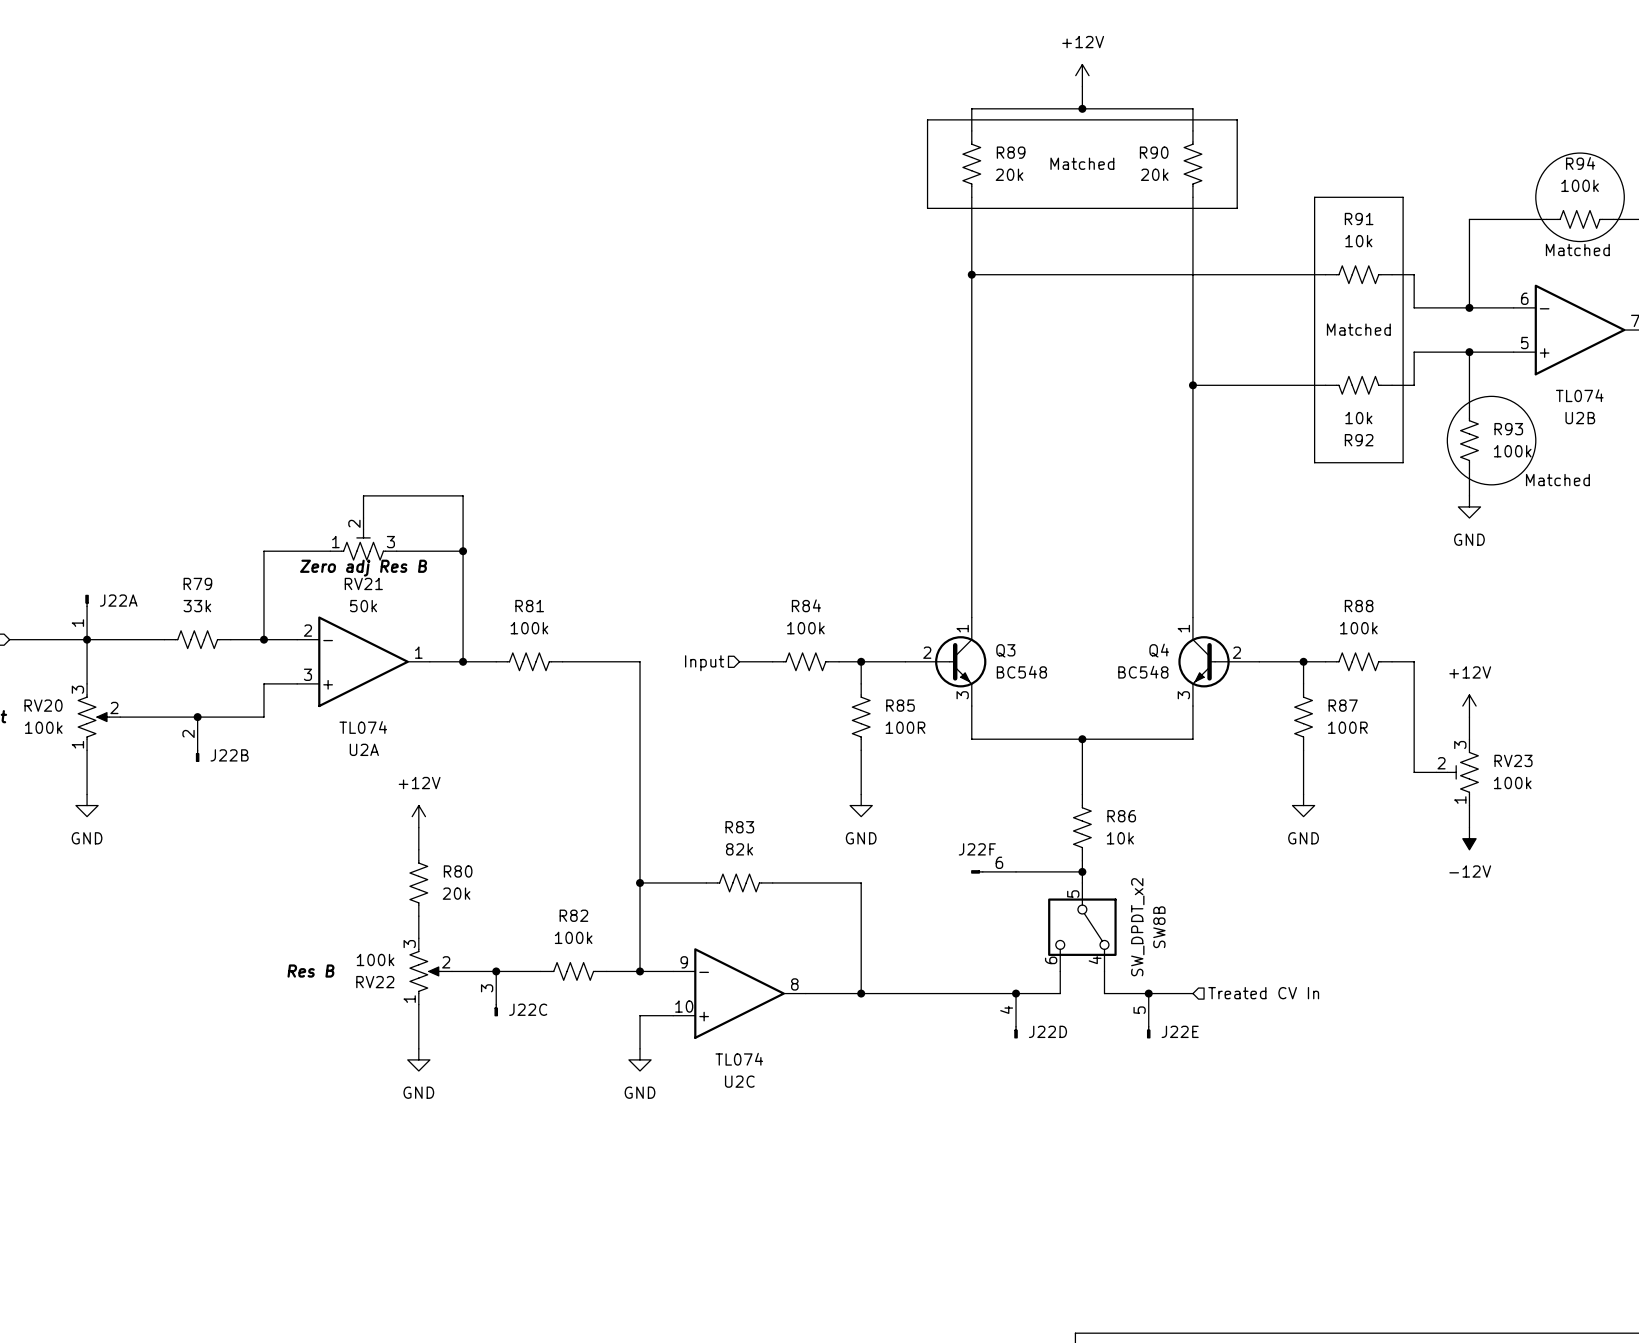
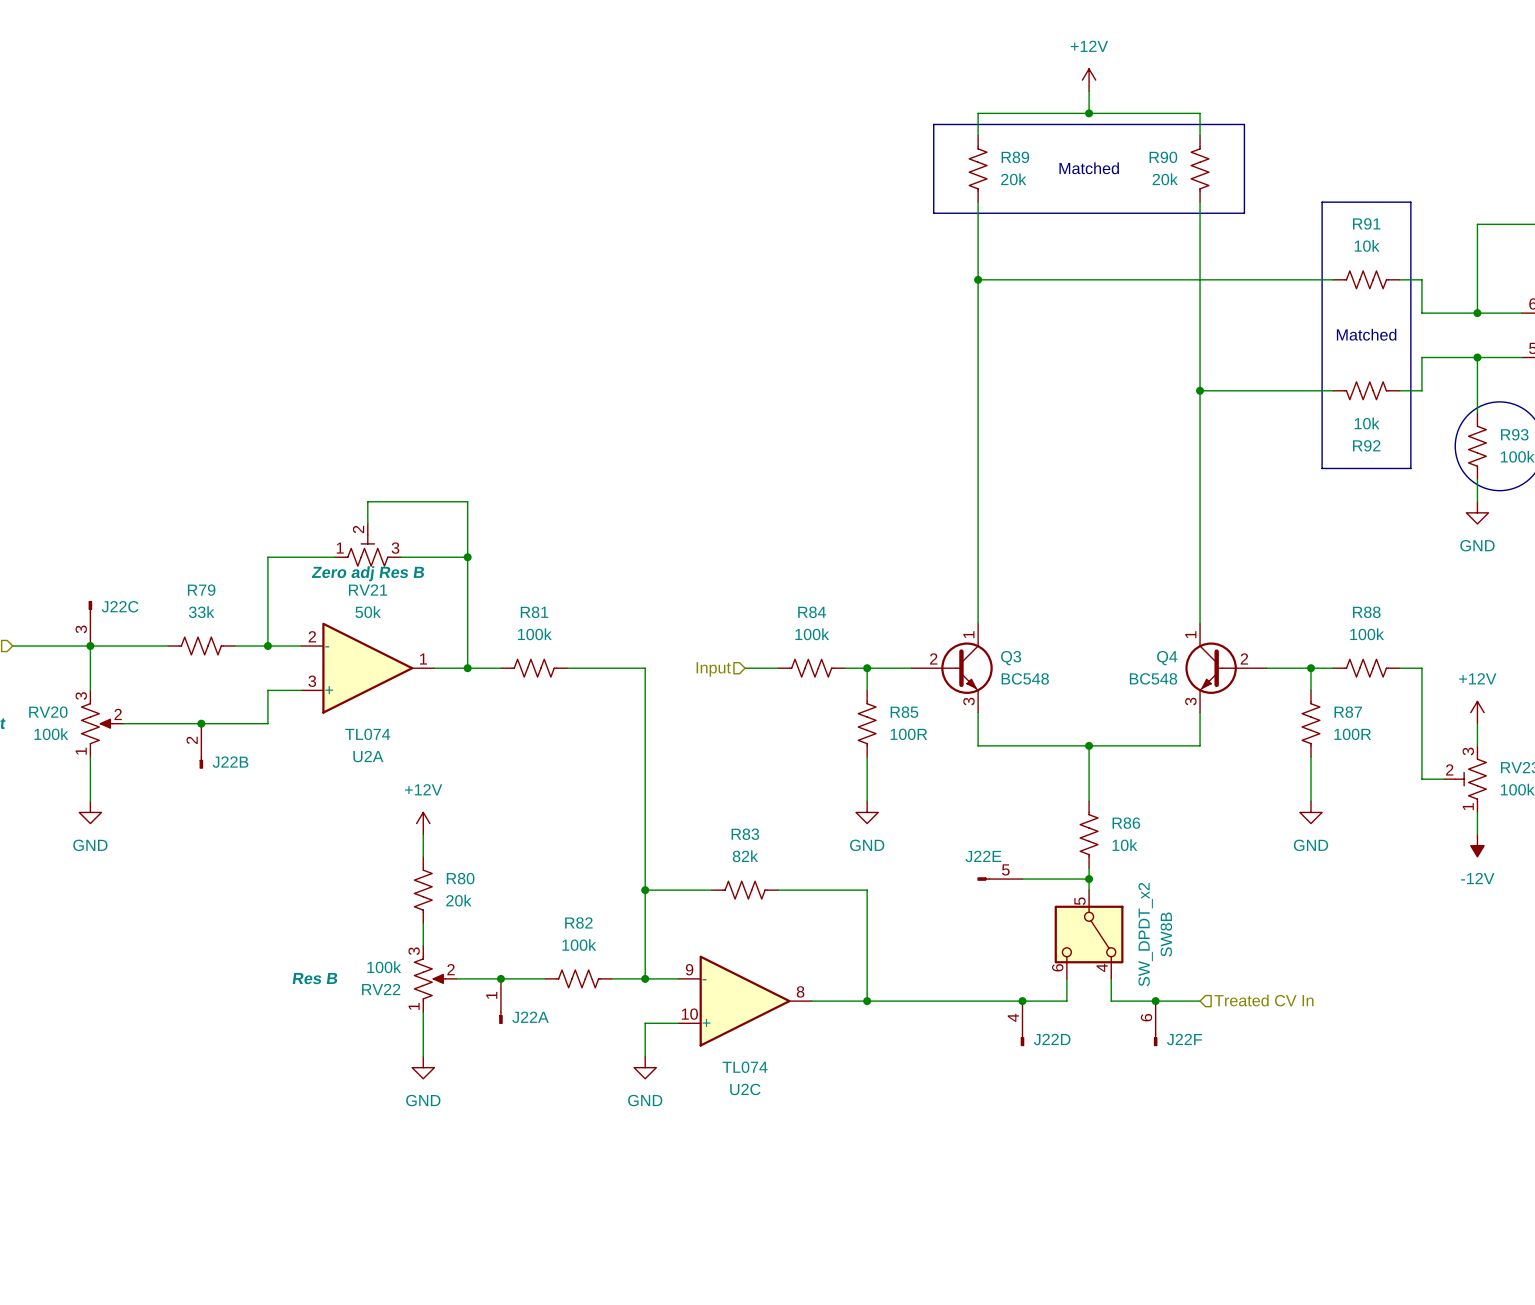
J22A rotation: 0° (87, 600) -> 180° (500, 1017)
J22A name position: J22A (118, 600) -> J22A (530, 1017)
J22A position: (87, 617) -> (500, 1001)
J22F name position: J22F (977, 849) -> J22F (1184, 1039)
J22F rotation: 0° (977, 871) -> 90° counterclockwise (1155, 1039)
J22F position: (993, 871) -> (1155, 1023)
J22C position: (496, 993) -> (90, 623)
J22C name position: J22C (528, 1009) -> J22C (120, 606)
J22C rotation: 0° (496, 1010) -> 180° (90, 607)
J22E position: (1148, 1016) -> (999, 879)
J22E name position: J22E (1180, 1031) -> J22E (983, 856)
J22E rotation: 0° (1148, 1032) -> 90° clockwise (983, 879)

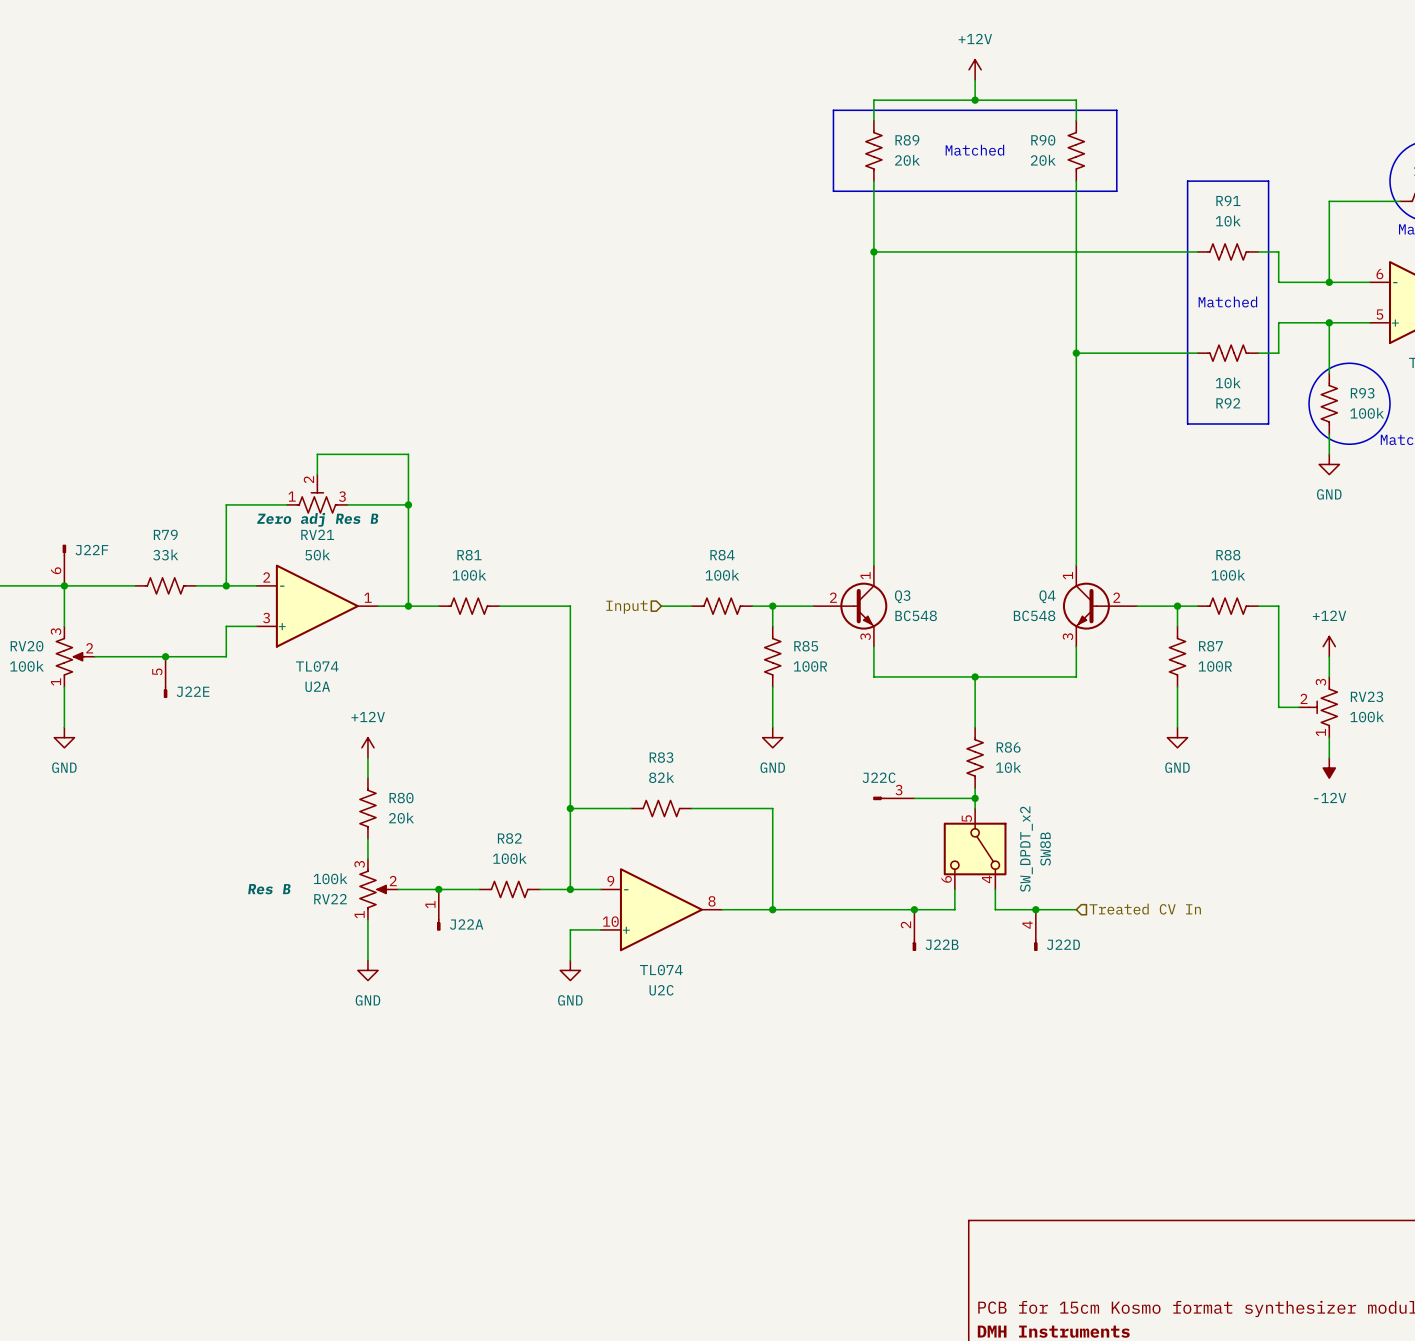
J22C rotation: 0° (90, 607) -> 90° counterclockwise (878, 798)
J22C position: (90, 623) -> (893, 798)
J22B position: (201, 746) -> (914, 930)
J22E name position: J22E (983, 856) -> J22E (193, 691)
J22E rotation: 0° (983, 879) -> 90° counterclockwise (165, 692)
J22E position: (999, 879) -> (165, 677)
J22D position: (1022, 1023) -> (1035, 930)
J22F position: (1155, 1023) -> (64, 565)
J22F rotation: 0° (1155, 1039) -> 180° (64, 550)
J22F name position: J22F (1184, 1039) -> J22F (91, 550)

